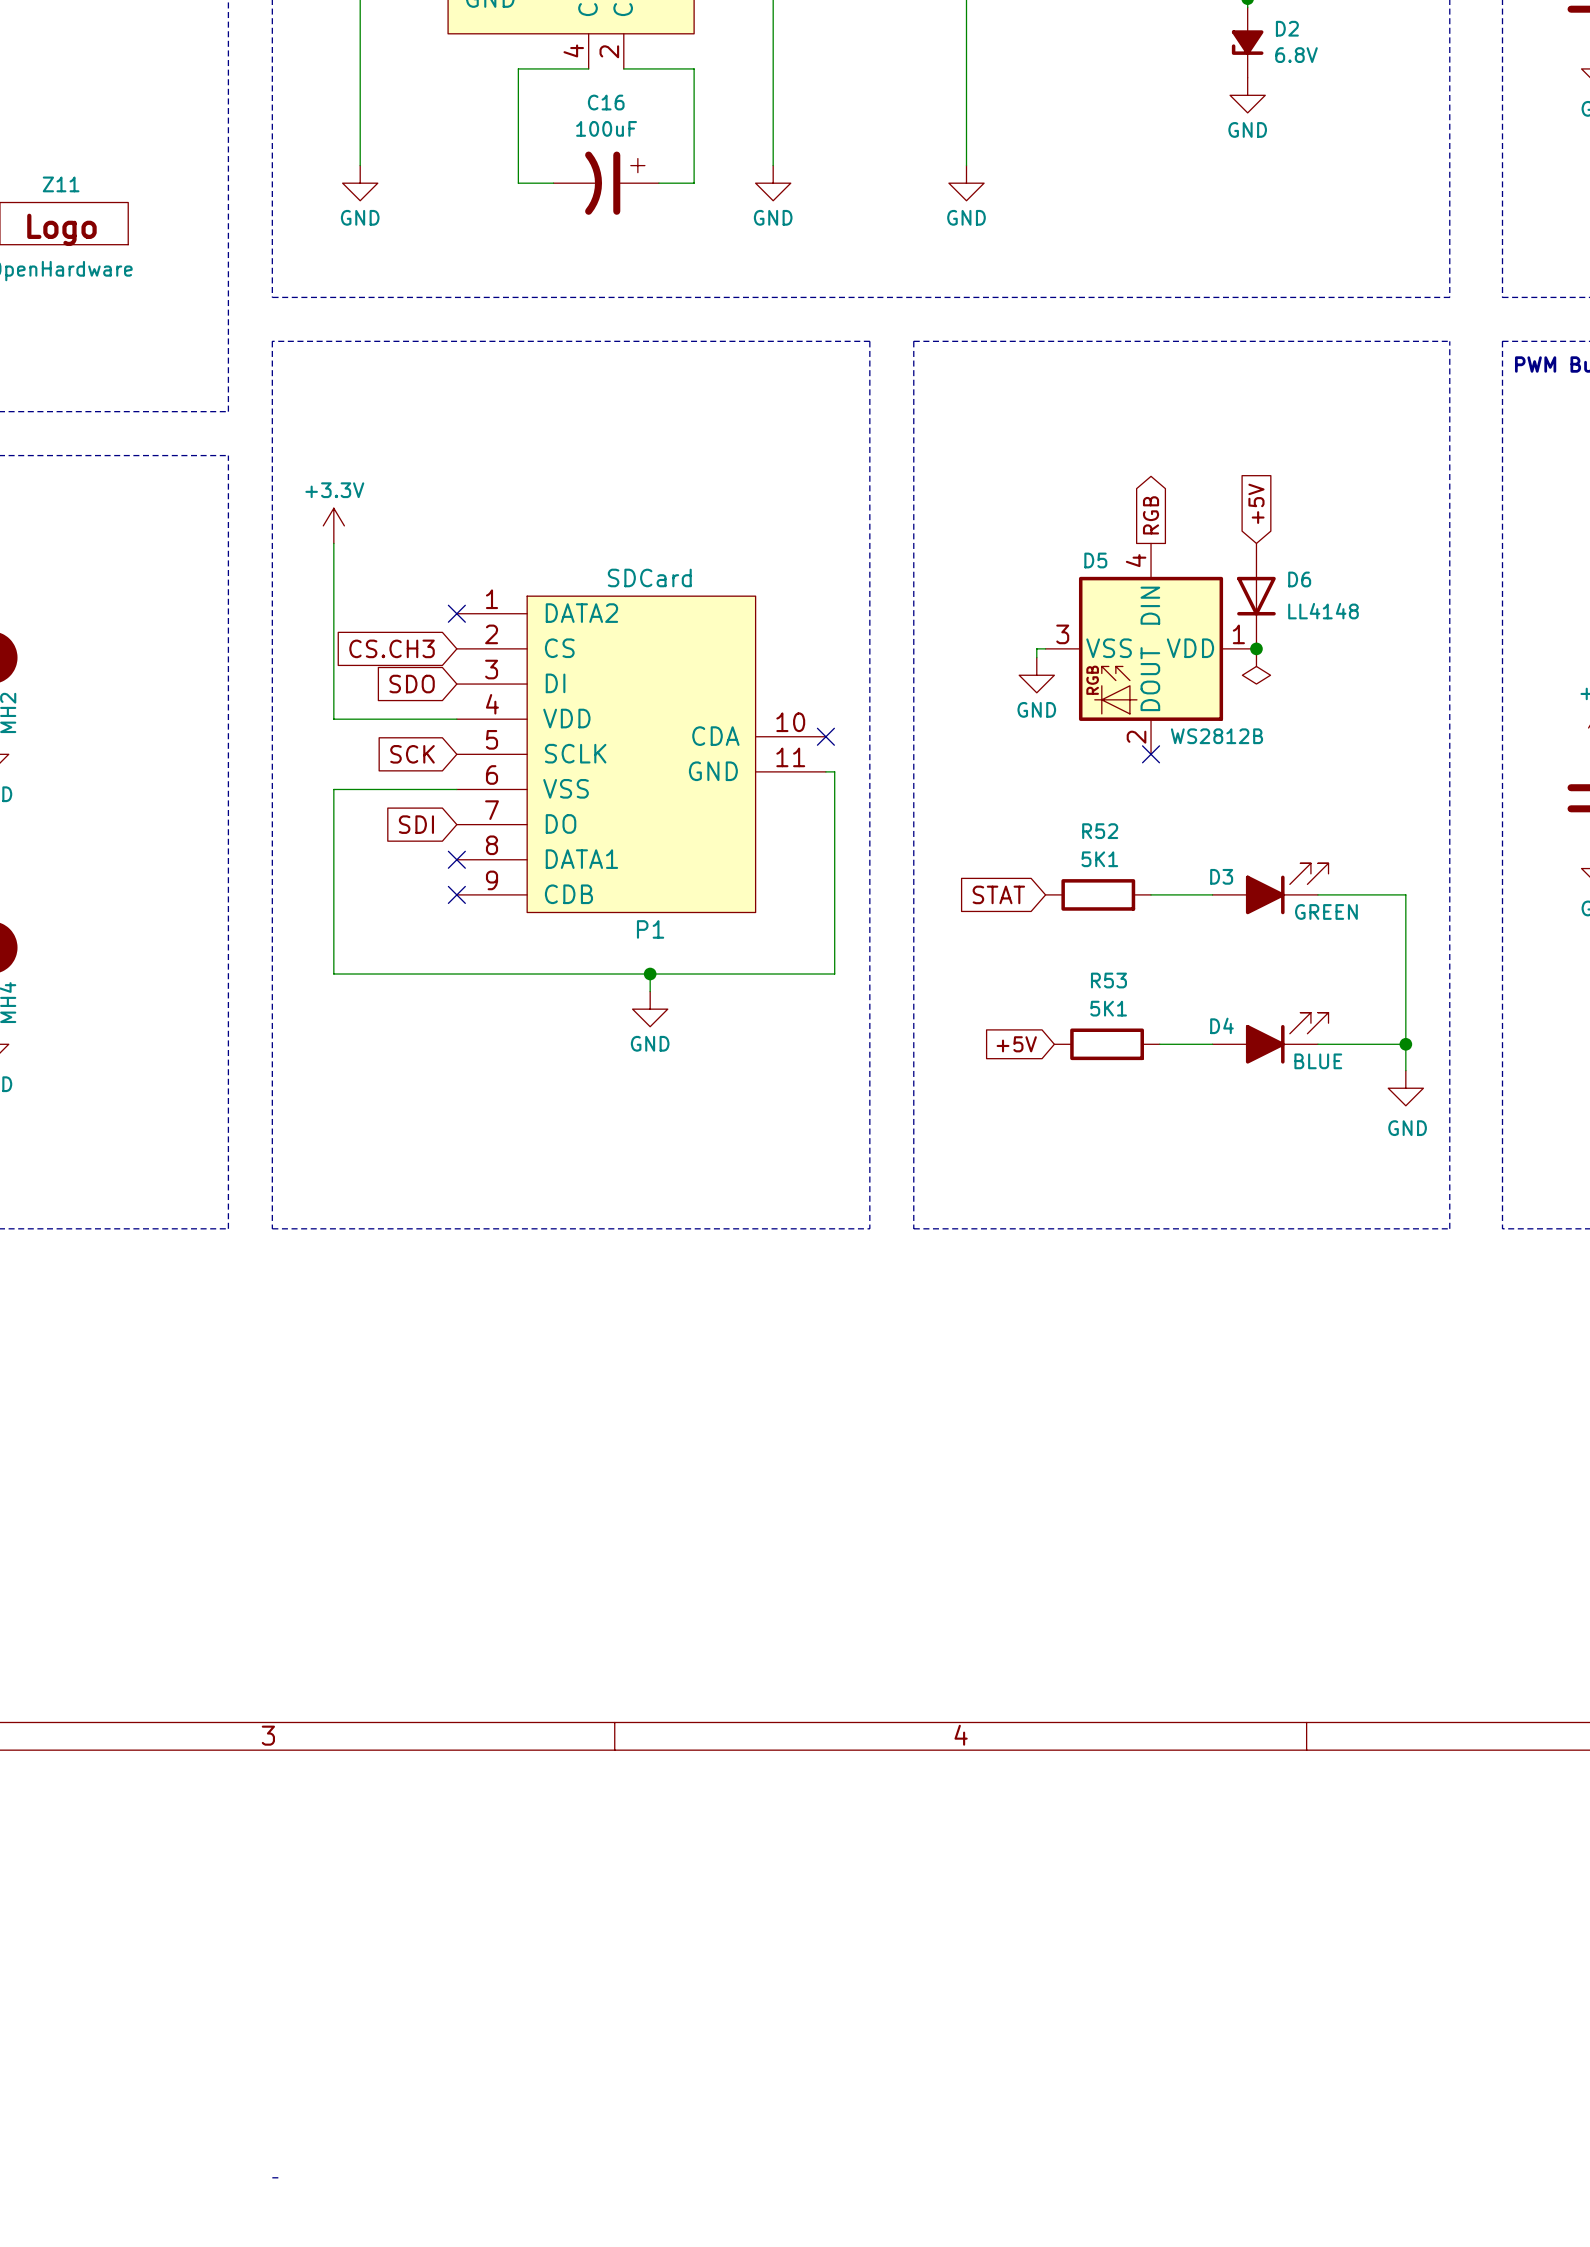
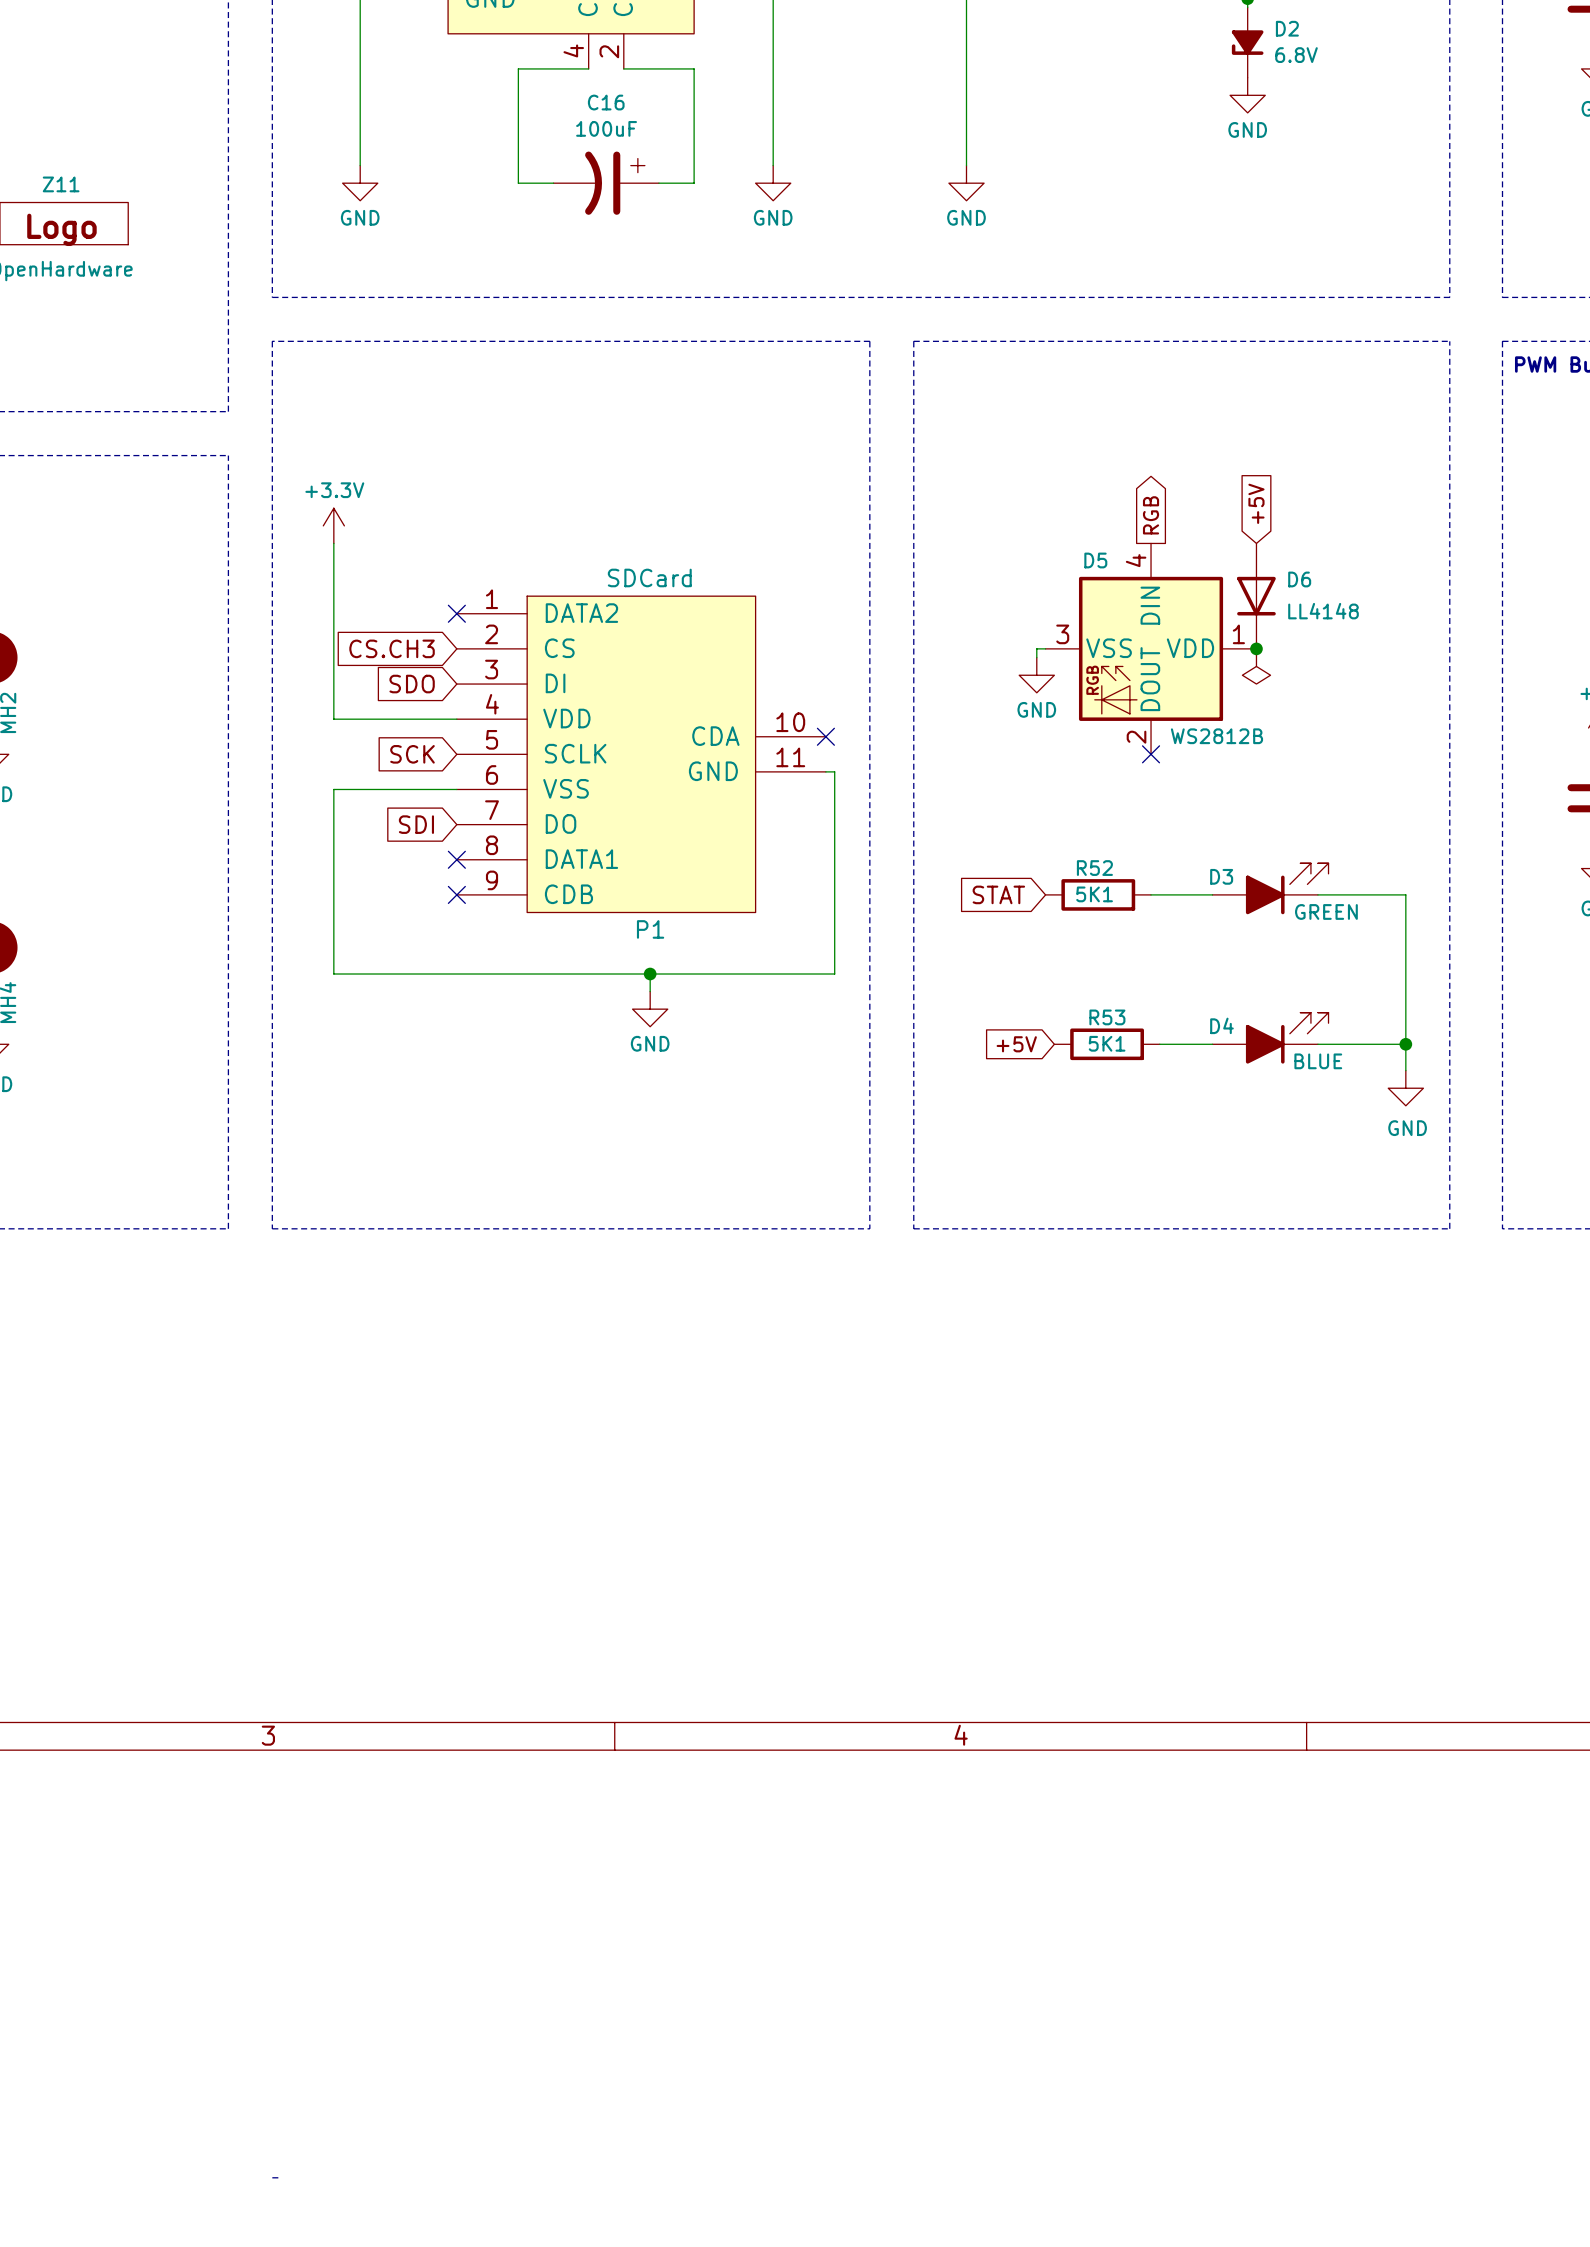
R52 name position: R52 (1100, 831) -> R52 (1094, 868)
R52 value position: 5K1 (1099, 859) -> 5K1 (1094, 894)
R53 name position: R53 (1108, 980) -> R53 (1107, 1017)
R53 value position: 5K1 (1108, 1008) -> 5K1 (1107, 1043)

